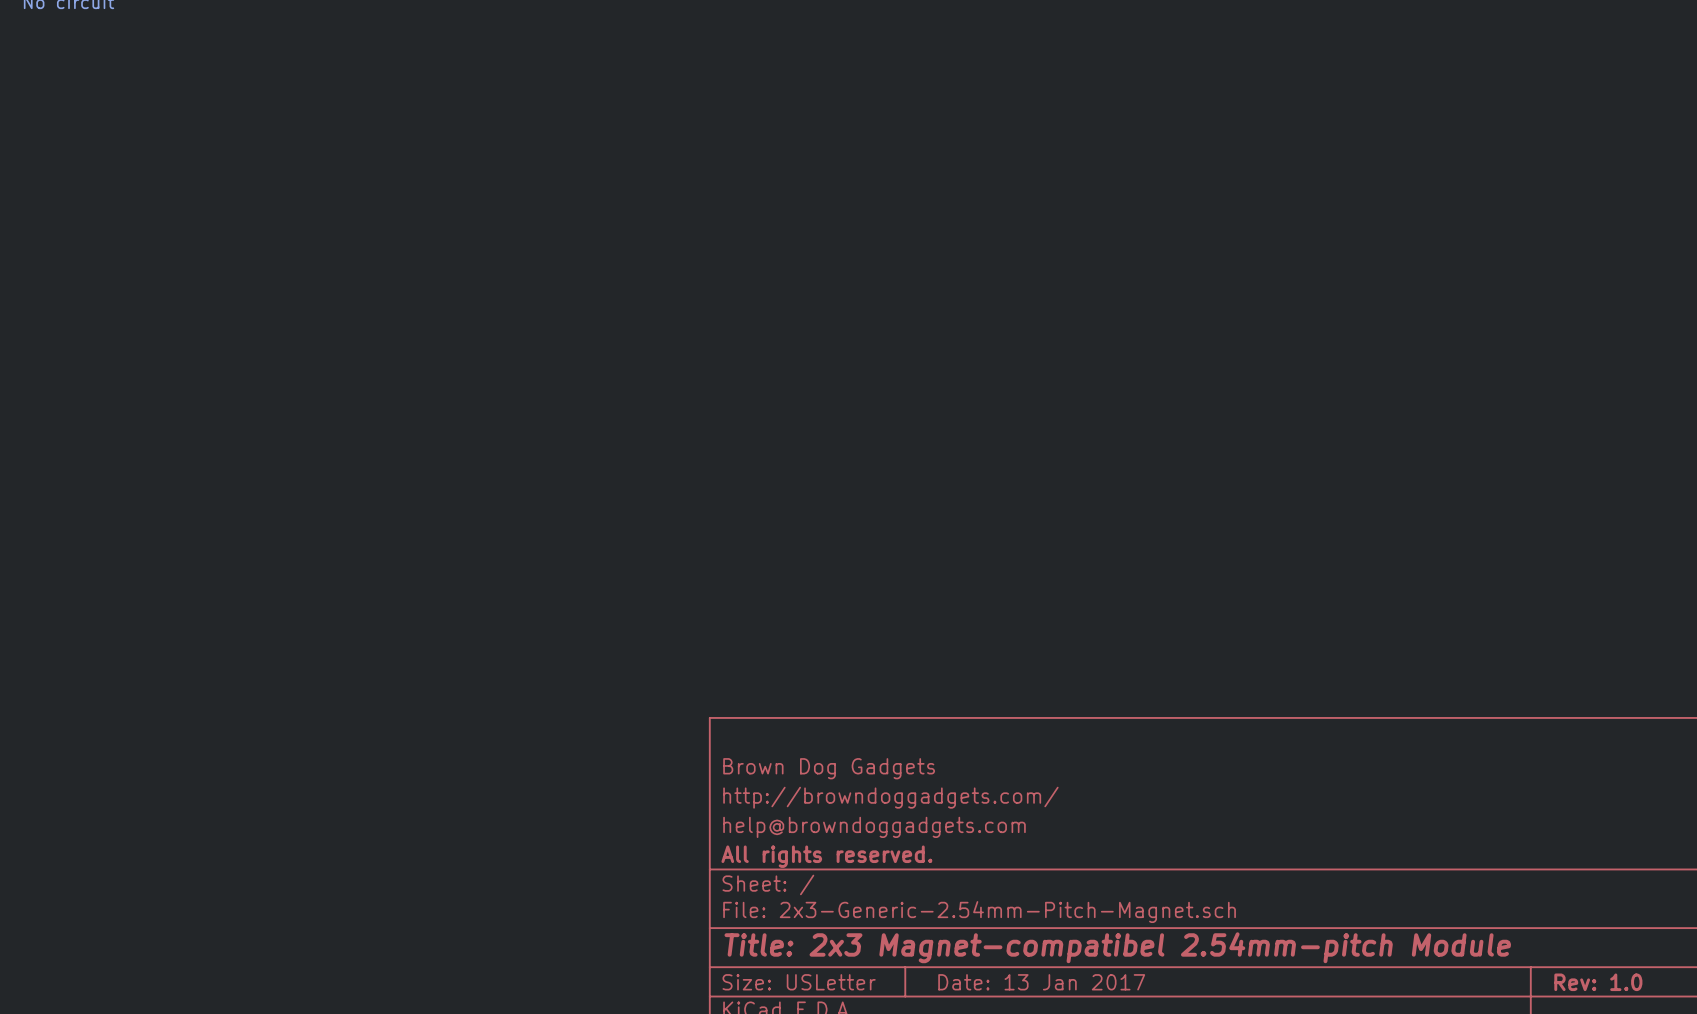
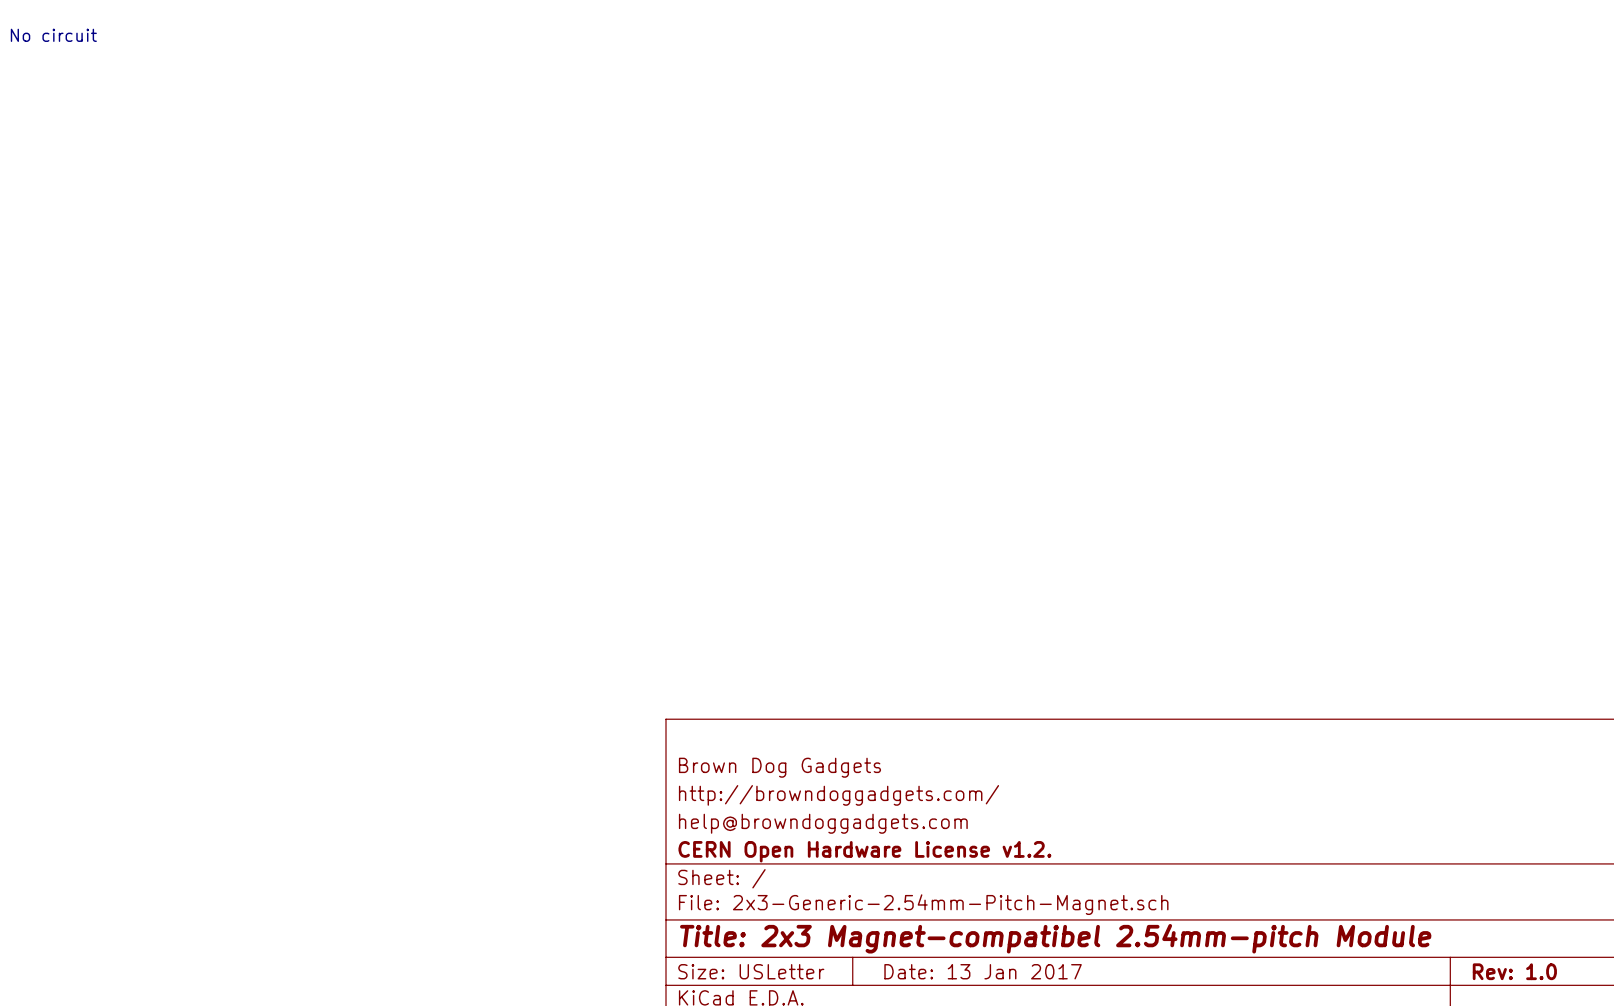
title block: All rights reserved. (826, 856) -> CERN Open Hardware License v1.2. (864, 851)

